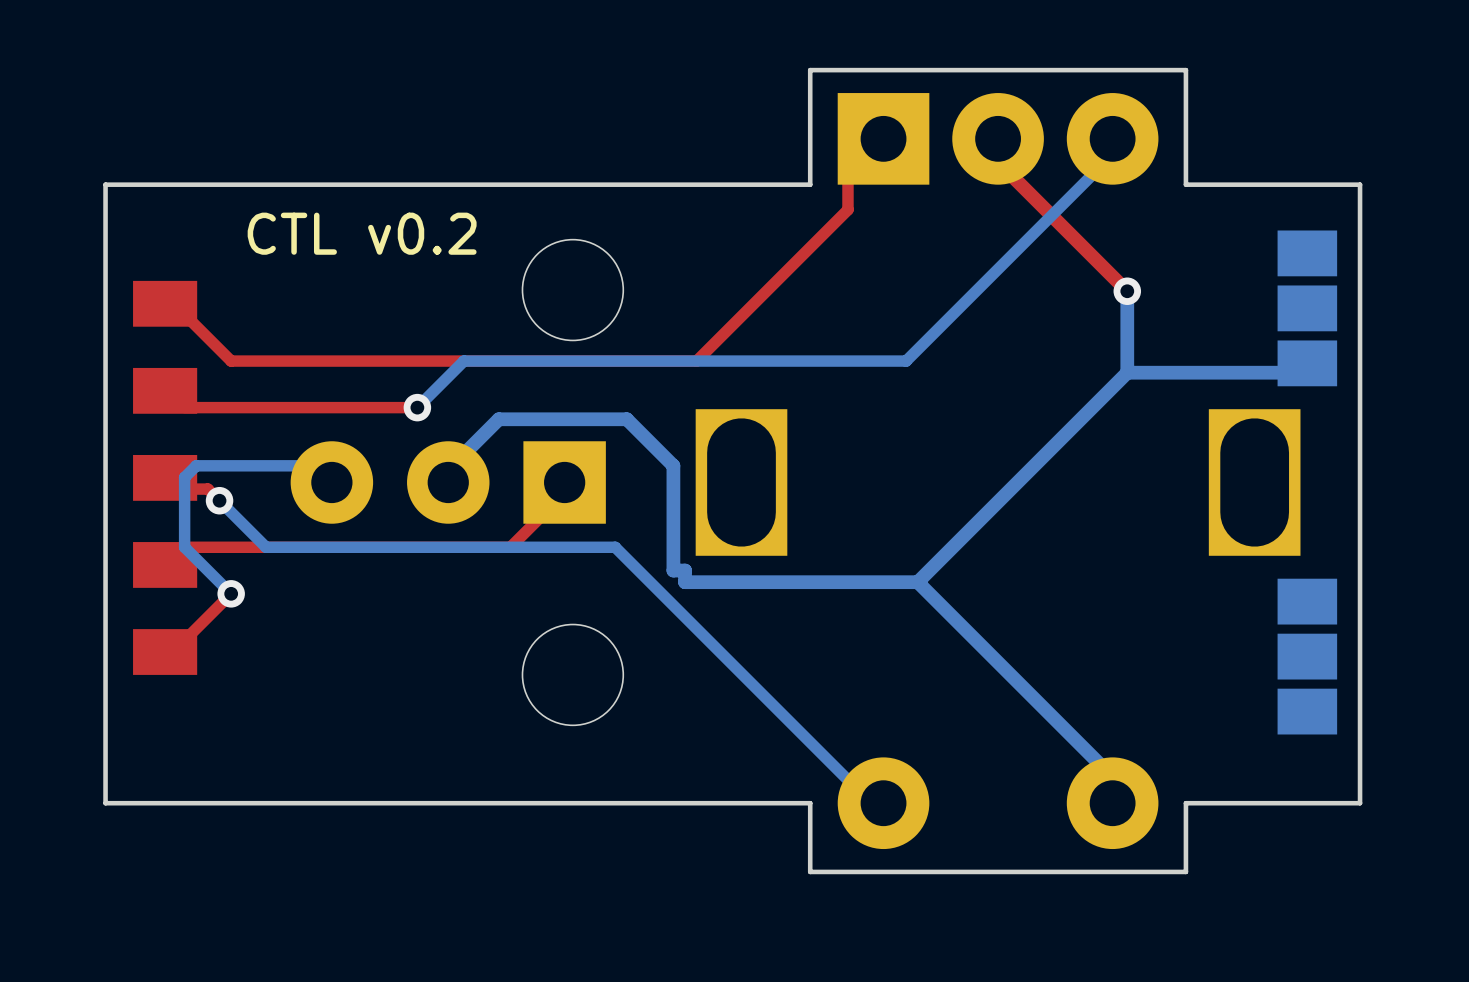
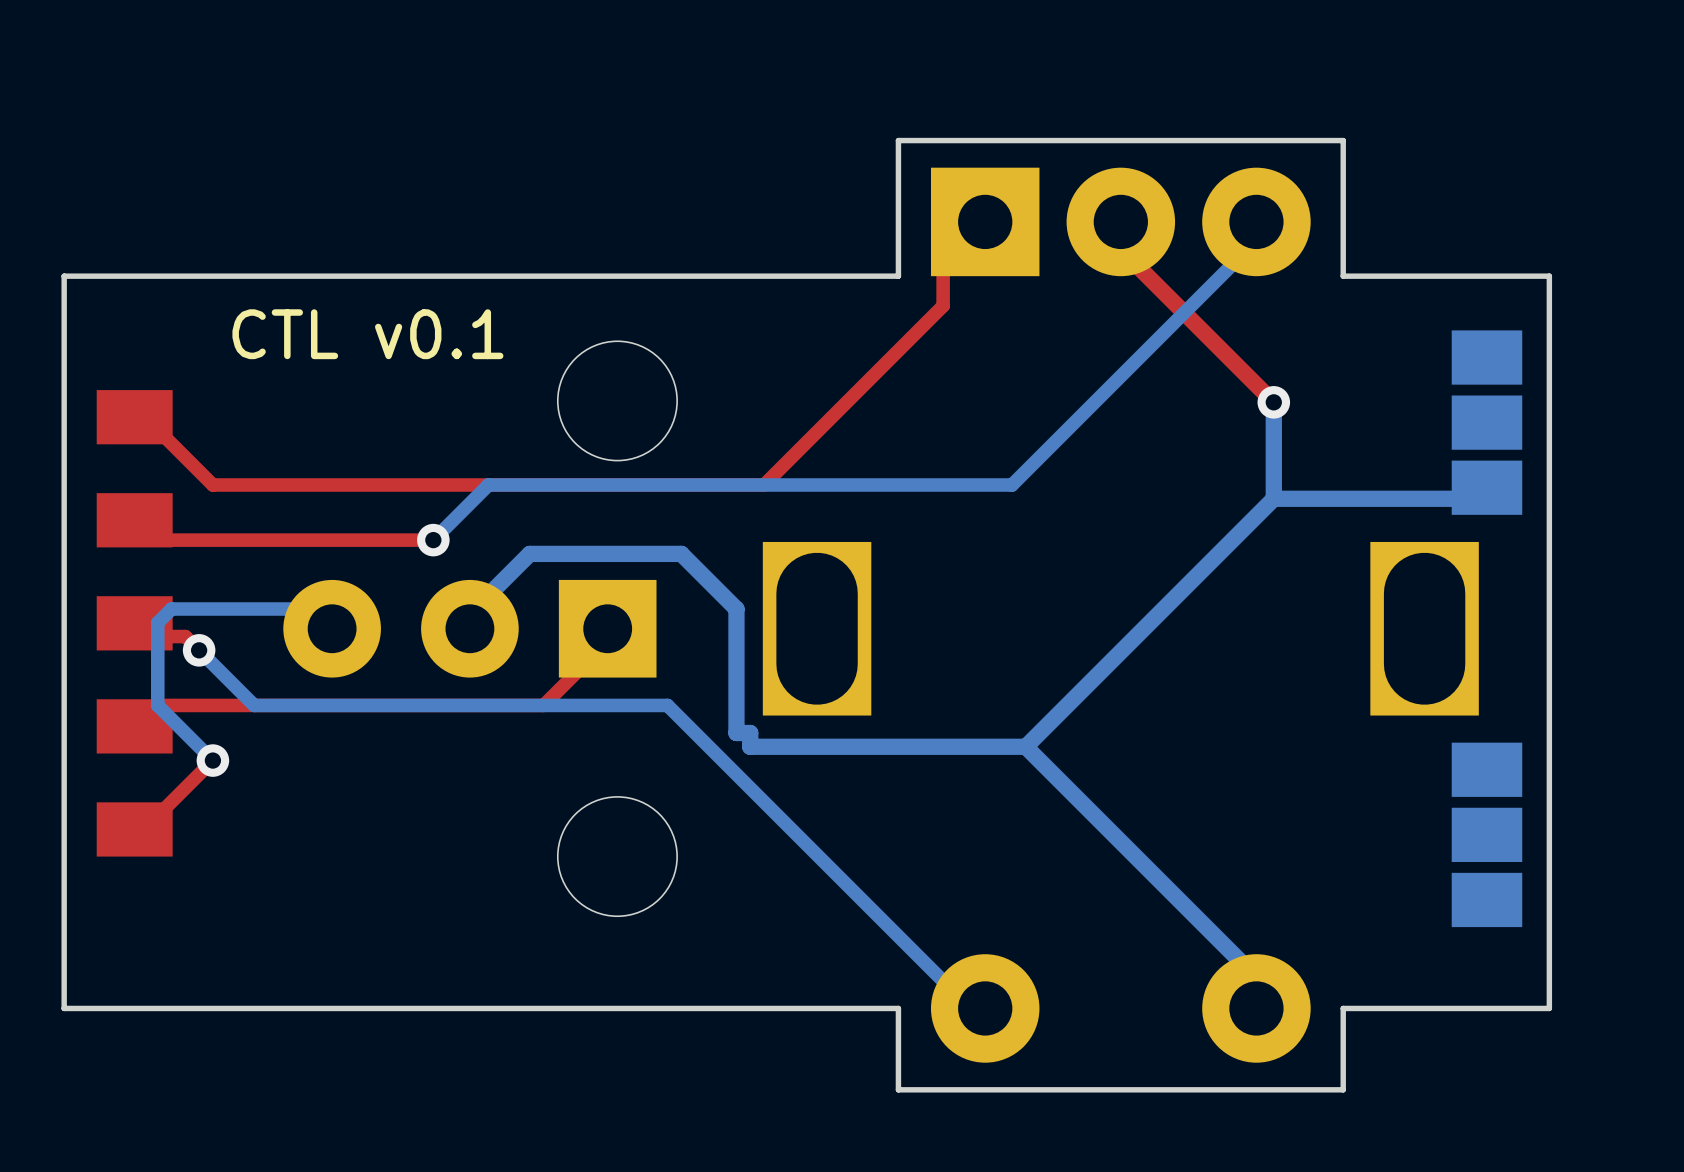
text: CTL v0.2 (362, 233) -> CTL v0.1 (367, 334)

